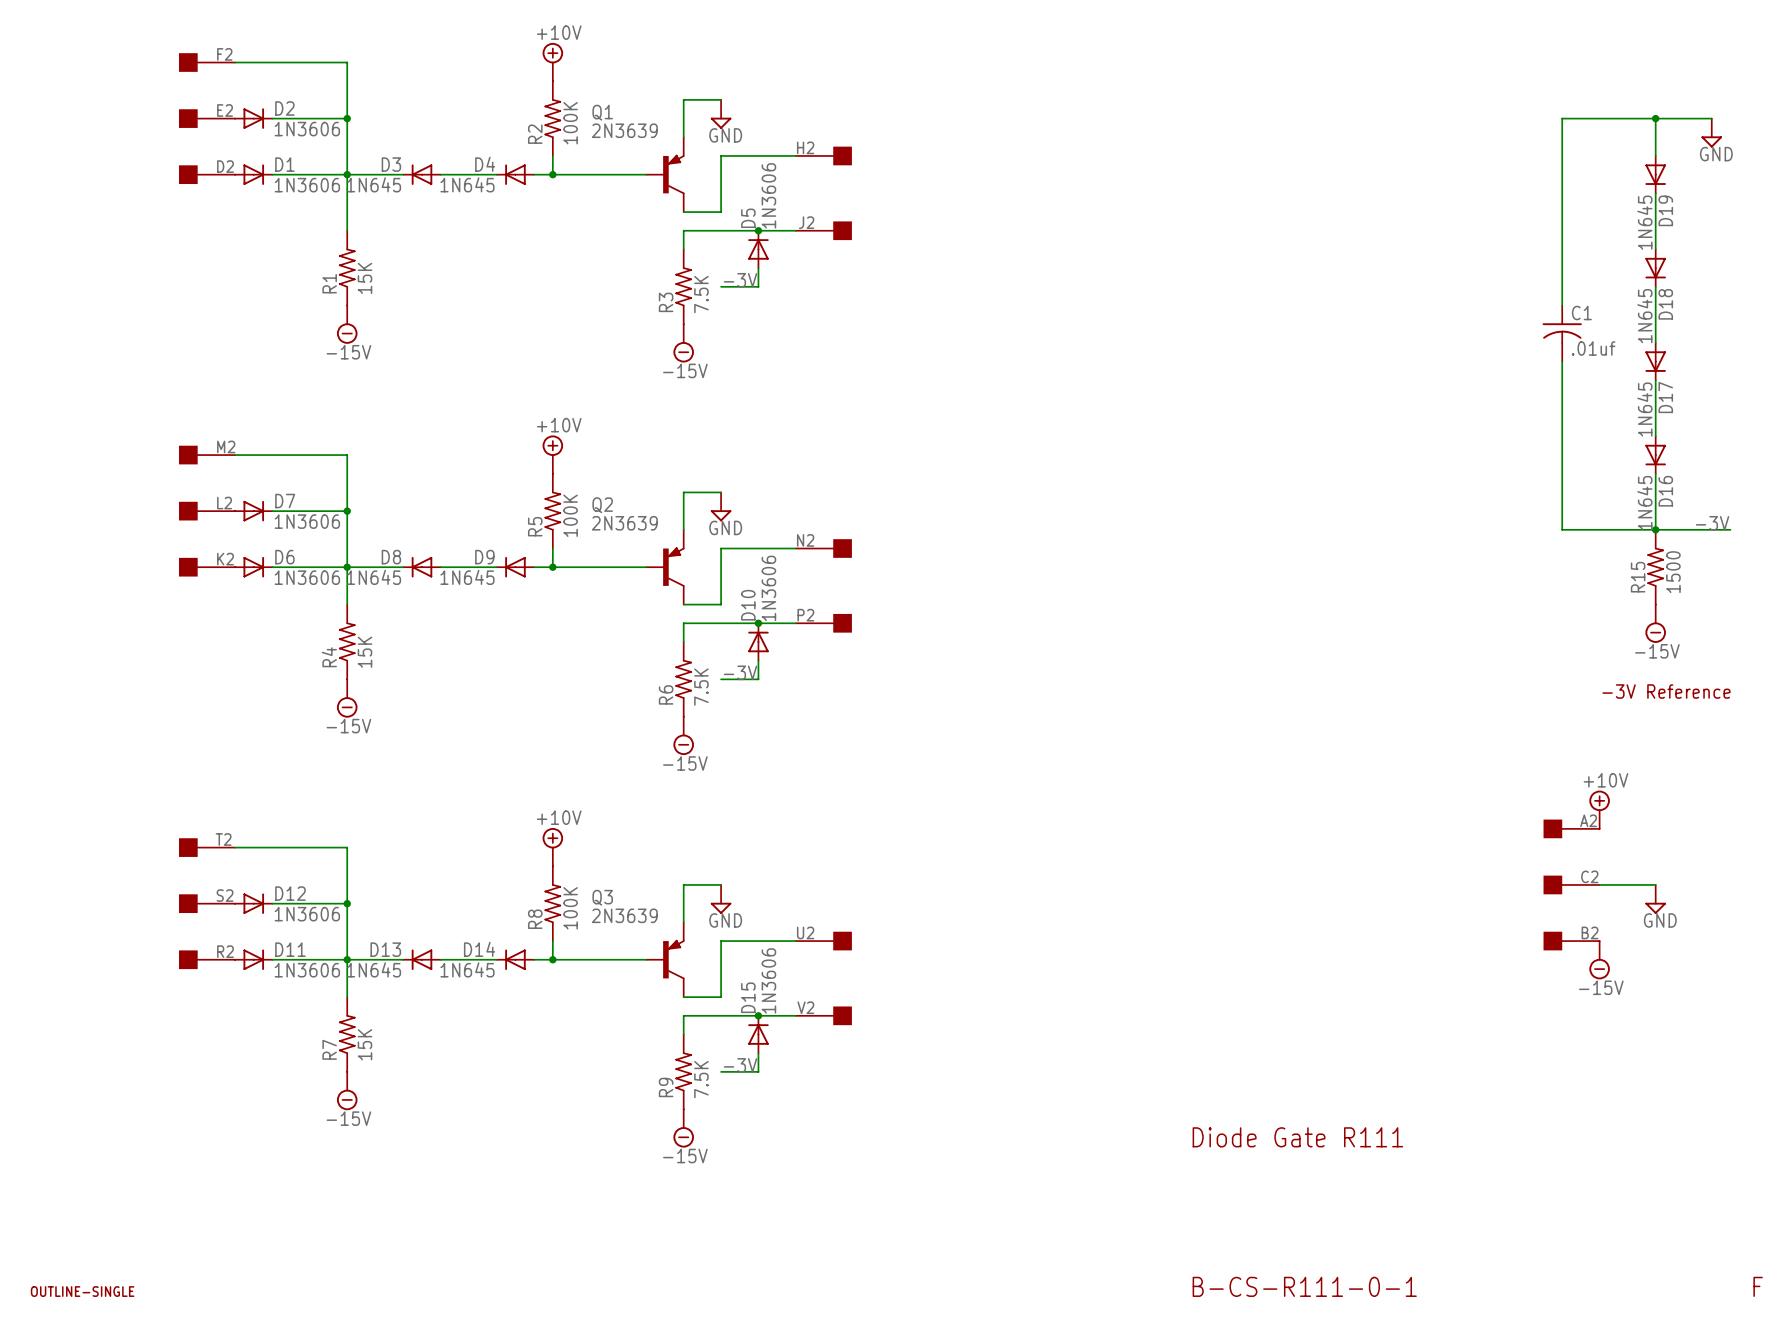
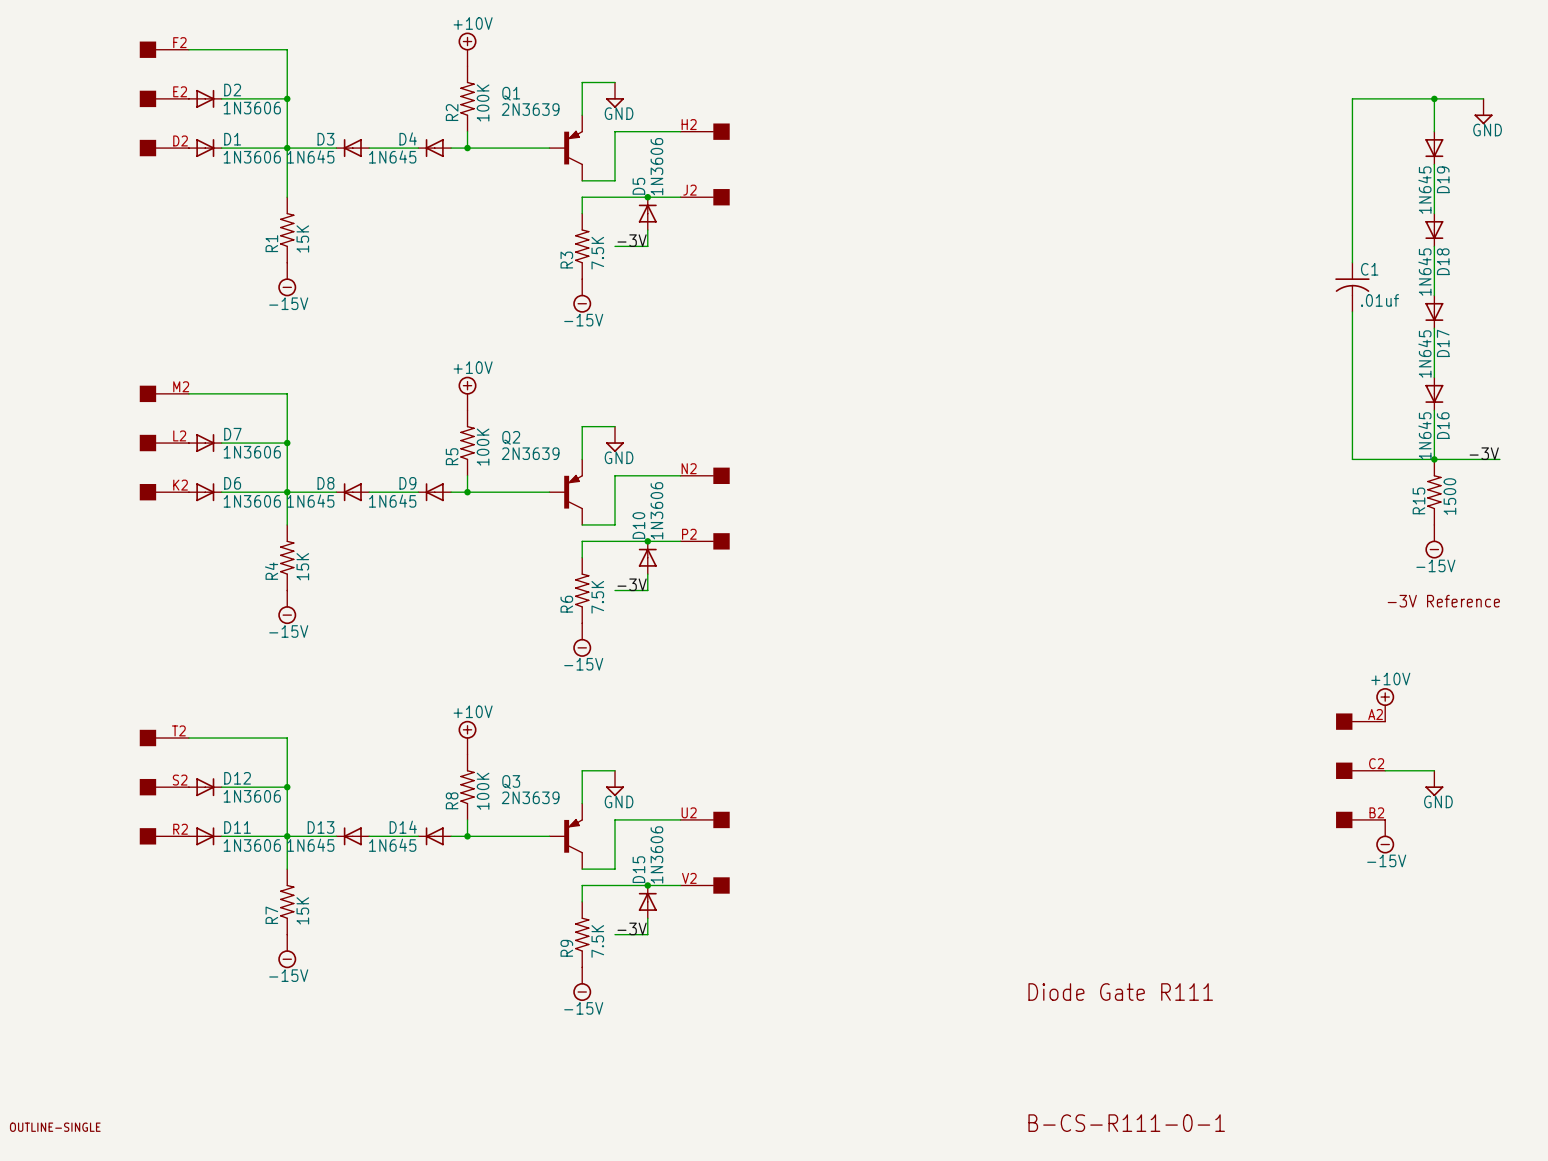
text: F (1758, 1286) -> none

